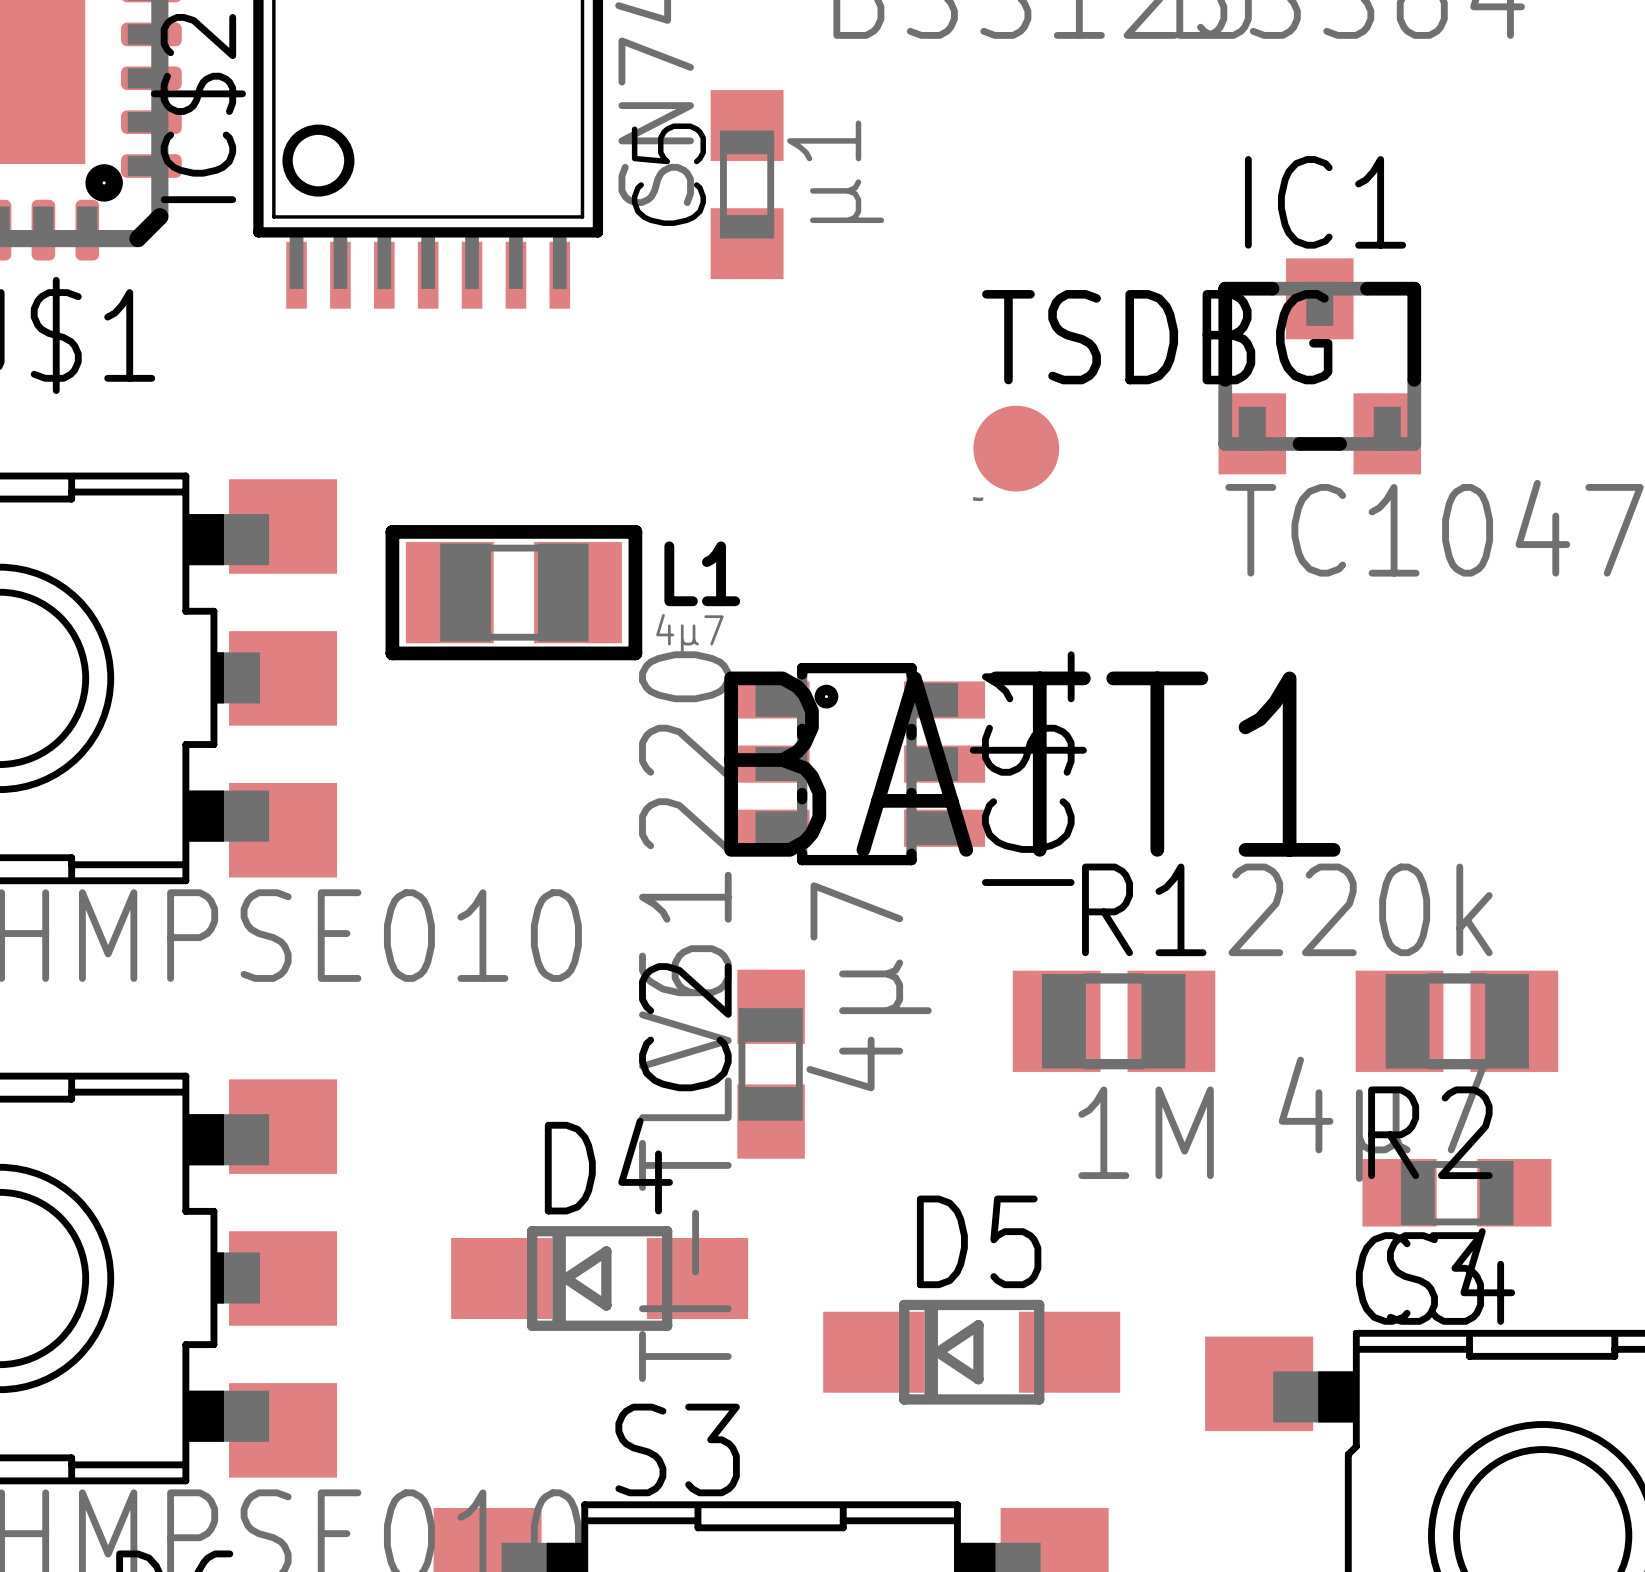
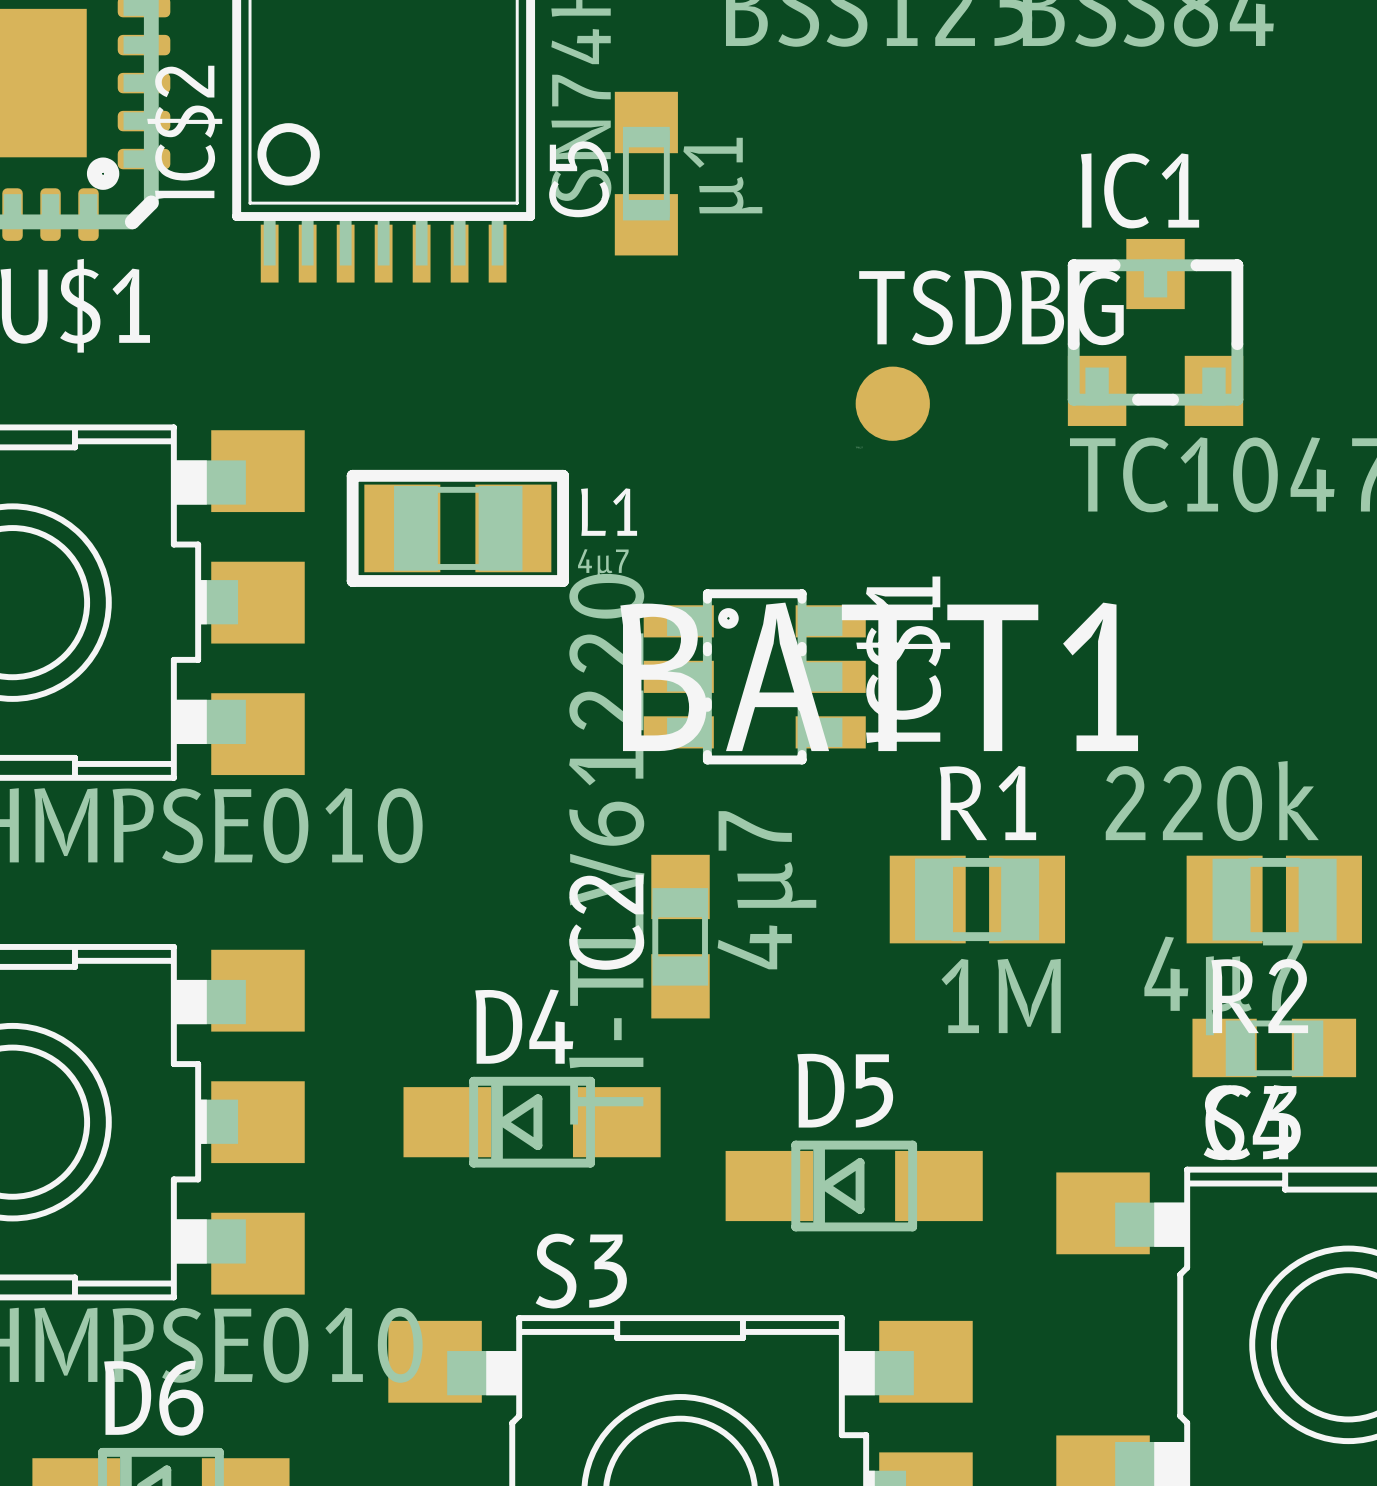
C5 position: (747, 184) -> (646, 173)

